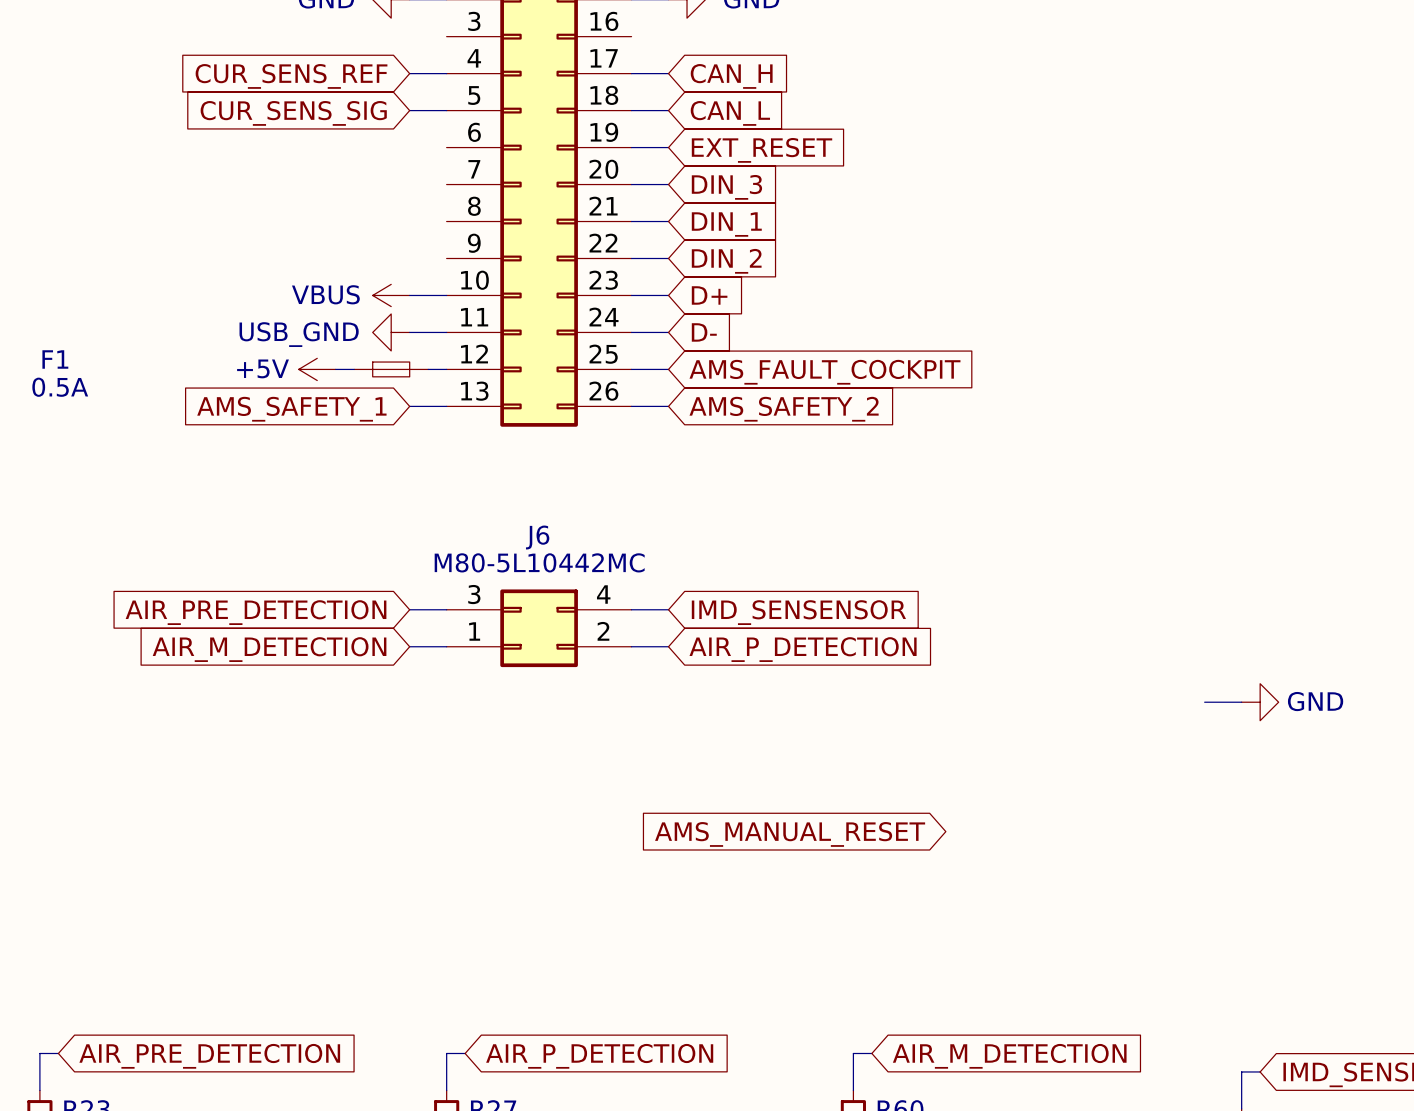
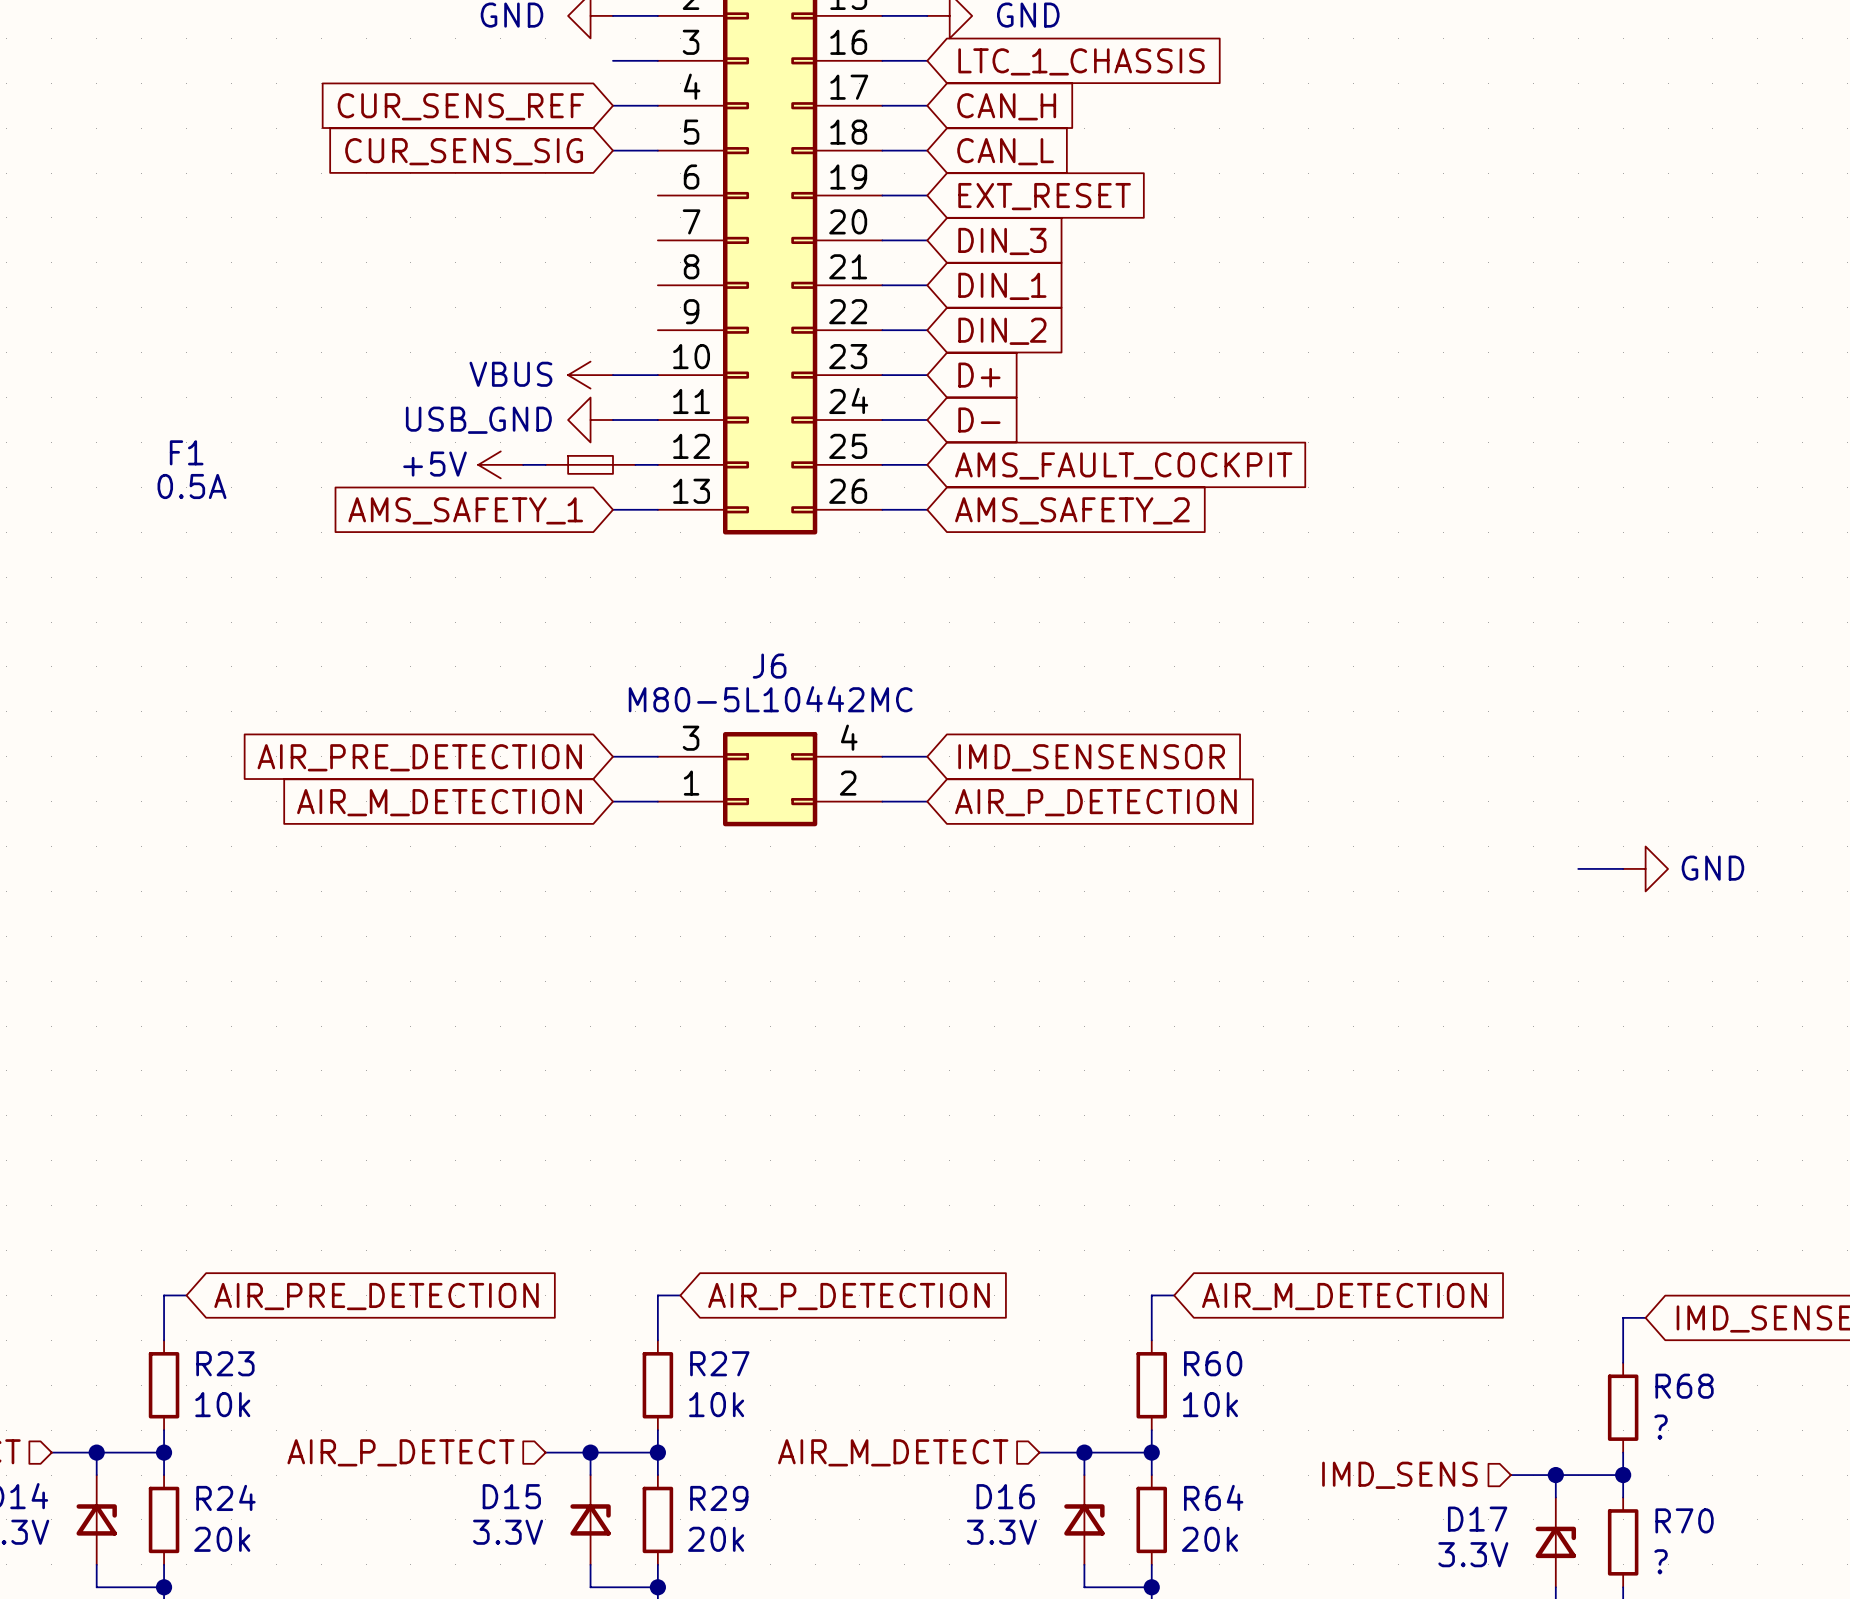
wire: none -> (613, 60) (657, 60)
wire: none -> (882, 60) (927, 60)
global label: none -> LTC_1_CHASSIS (1081, 61)
global label: AMS_MANUAL_RESET (790, 834) -> none

